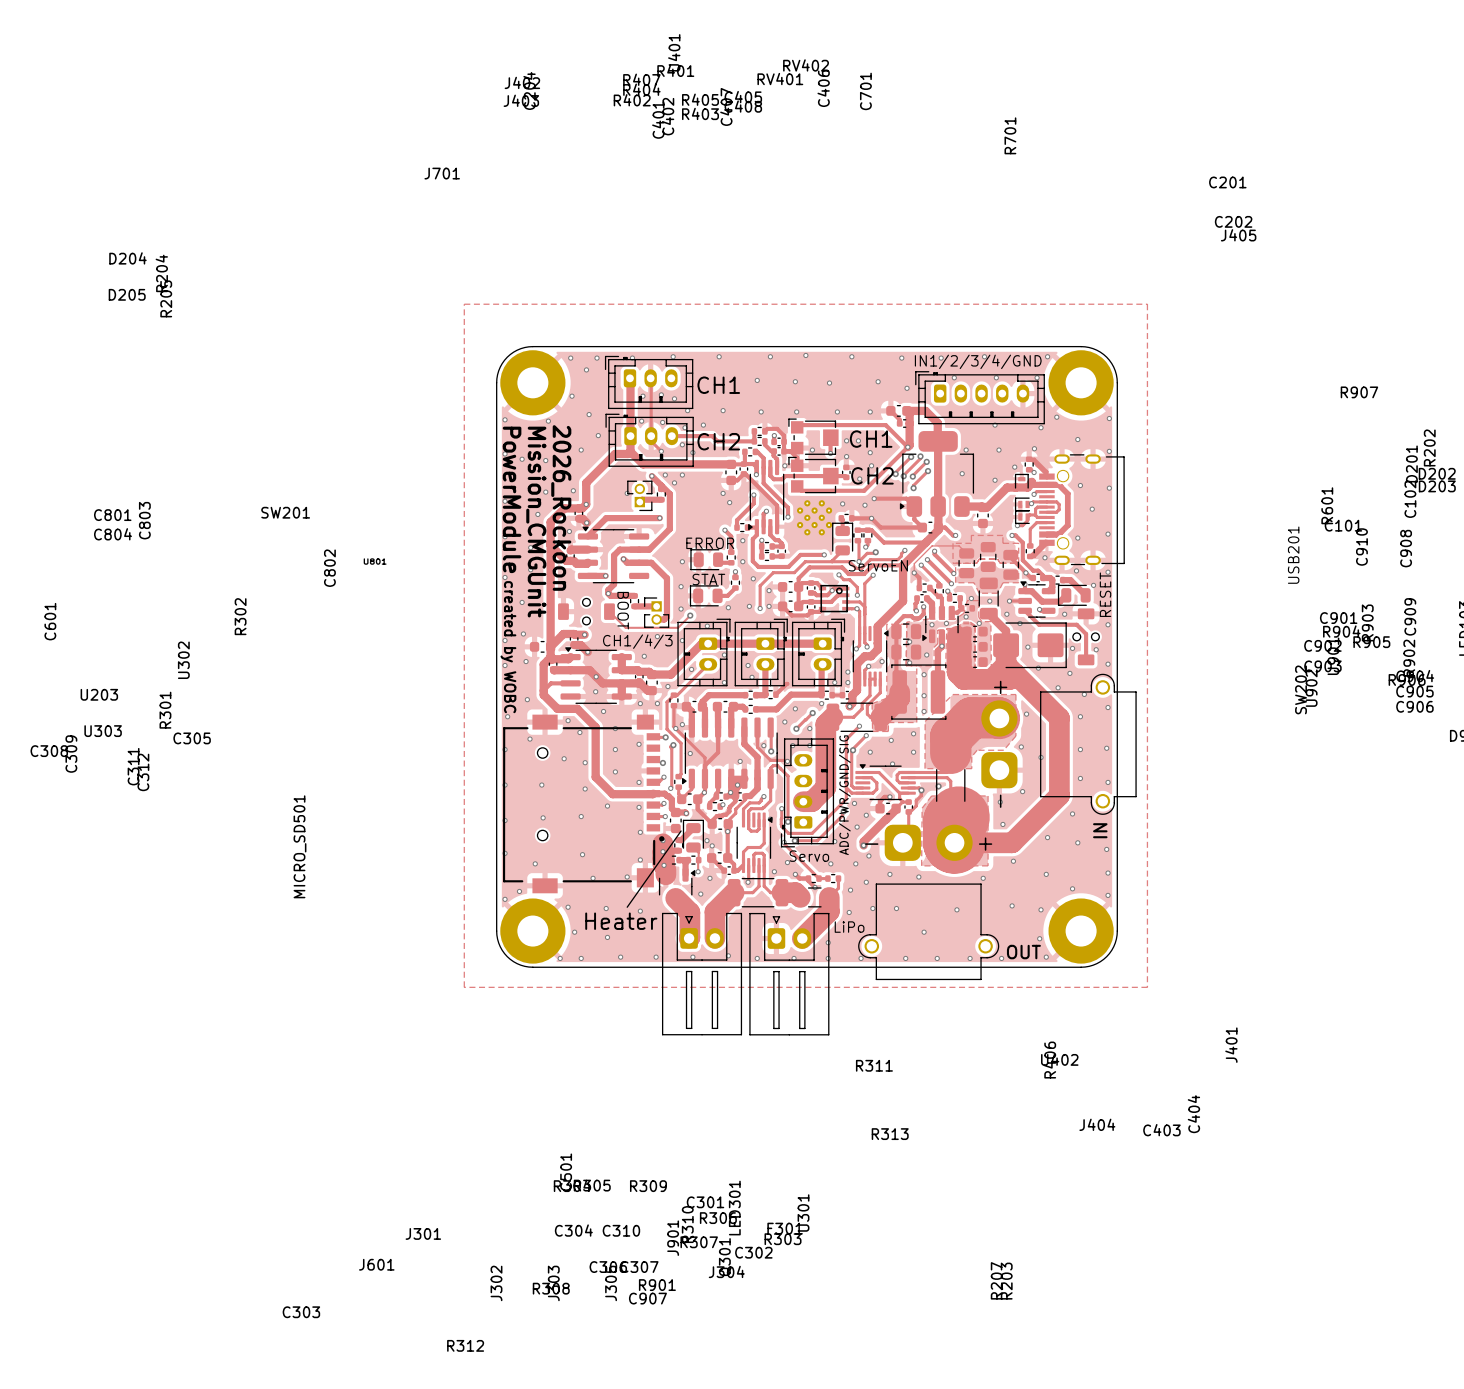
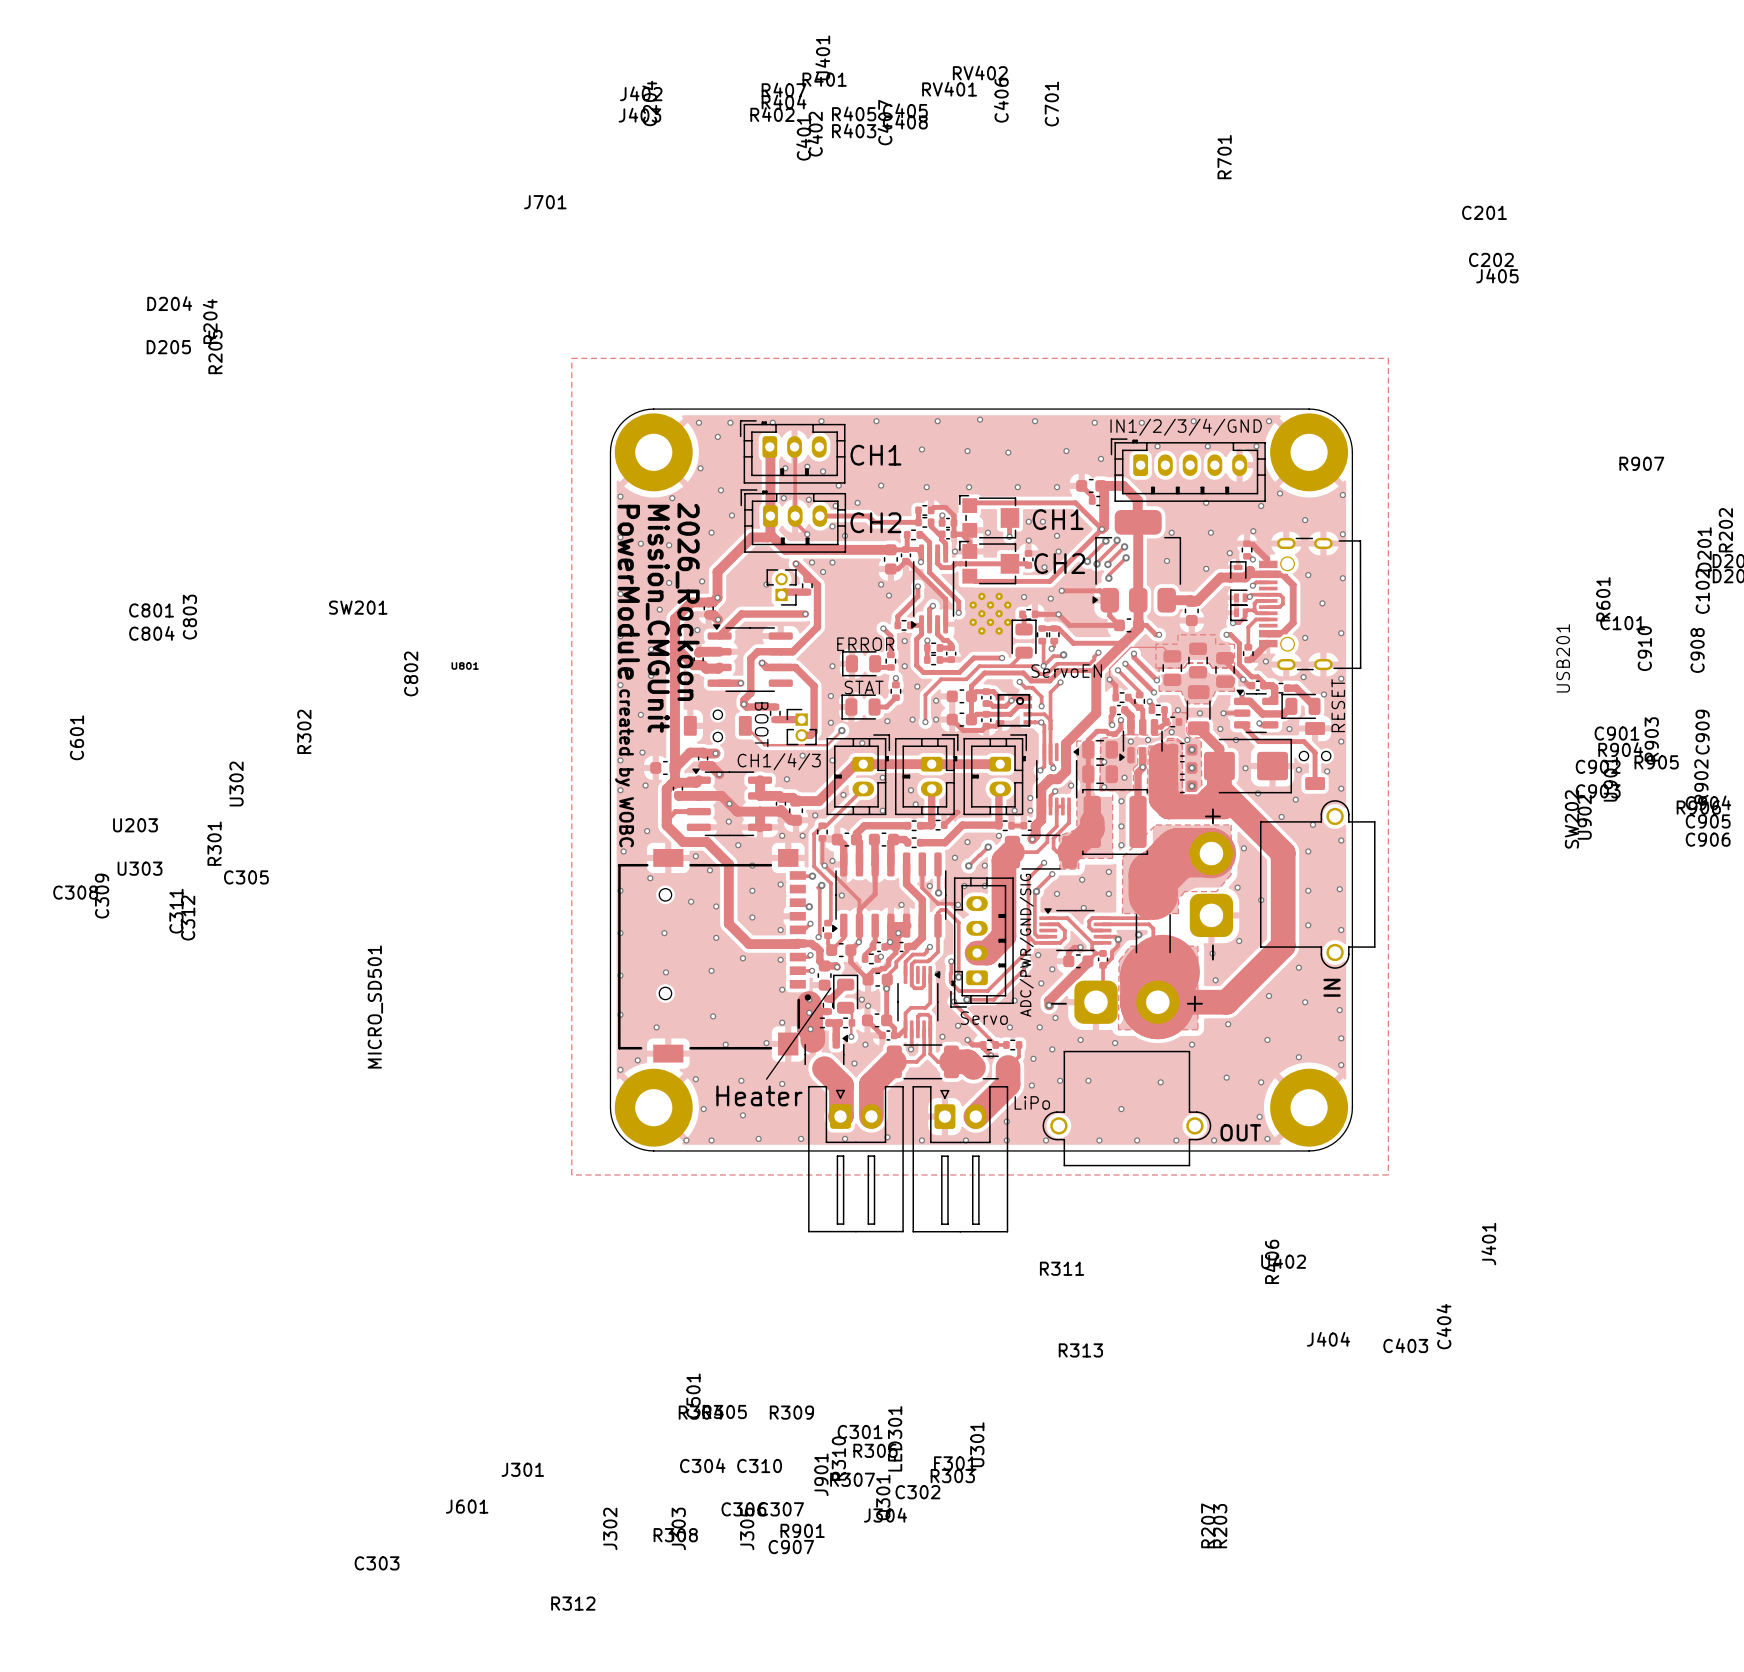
via: none -> (1191, 749)
via: none -> (1191, 767)
via: none -> (1191, 786)

